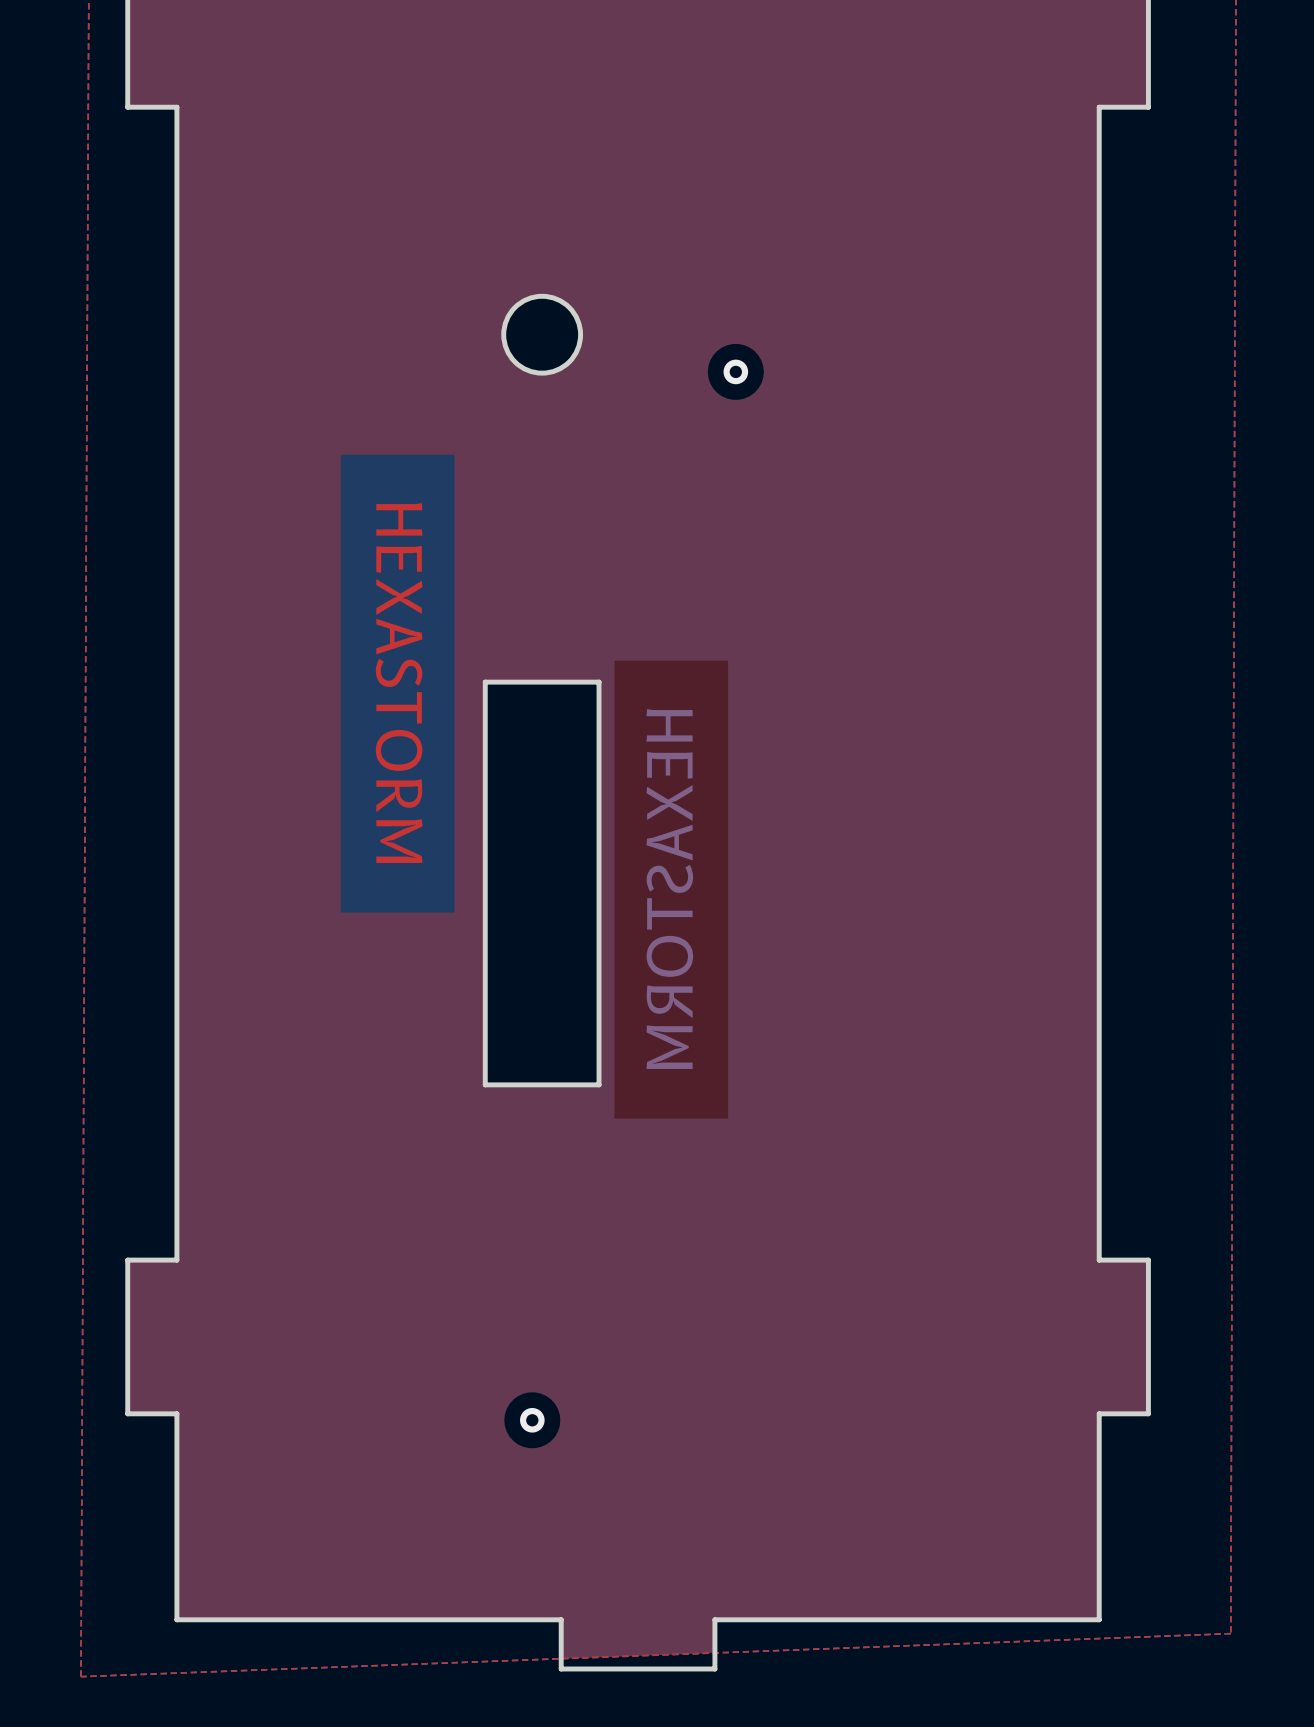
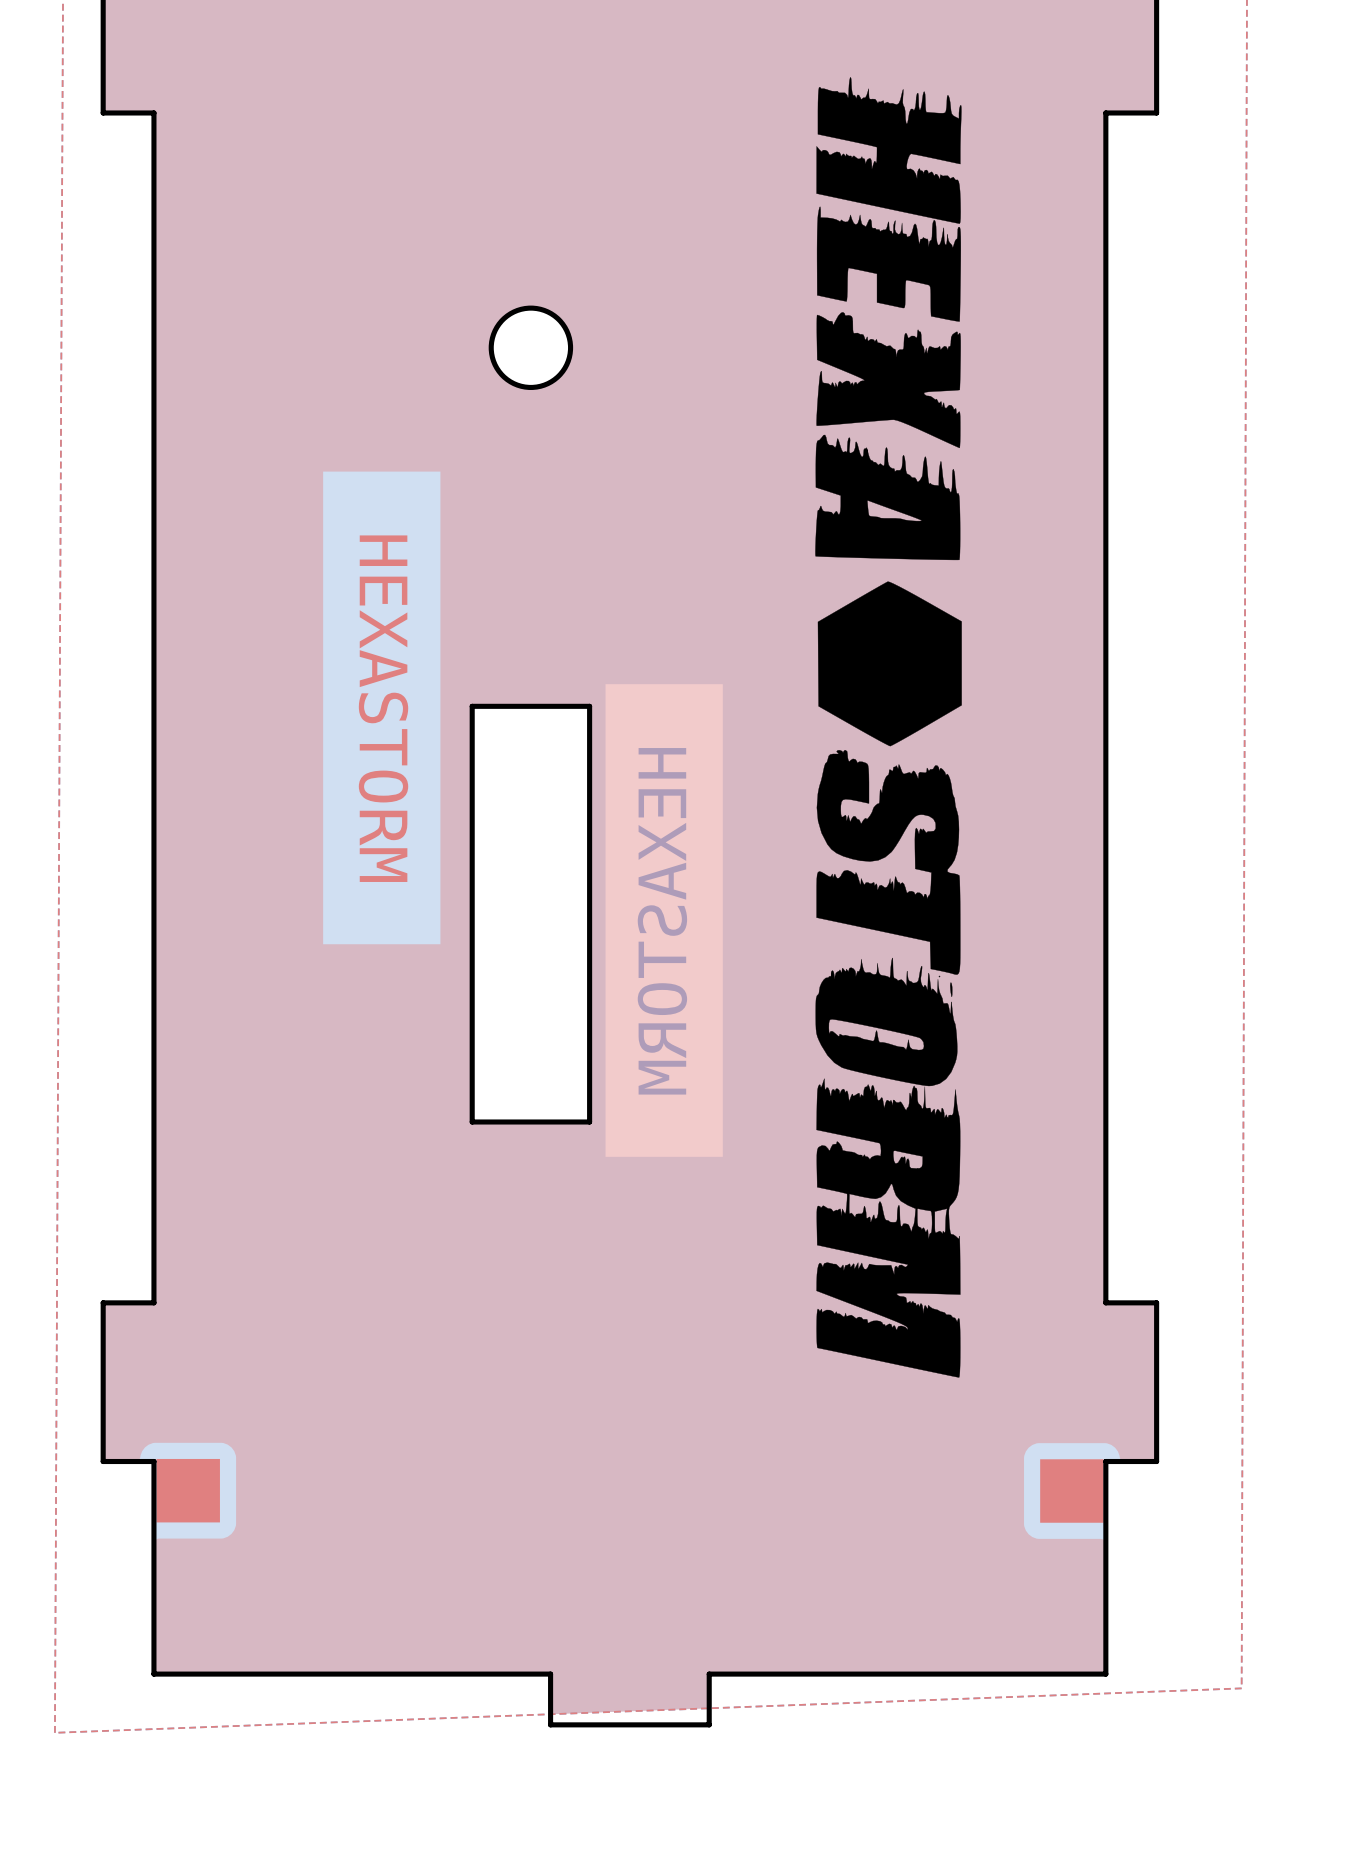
drawing: none -> [815, 77, 962, 1378]
via: (735, 371) -> none
via: (532, 1420) -> none
part: none -> (188, 1490)
part: none -> (1071, 1491)

